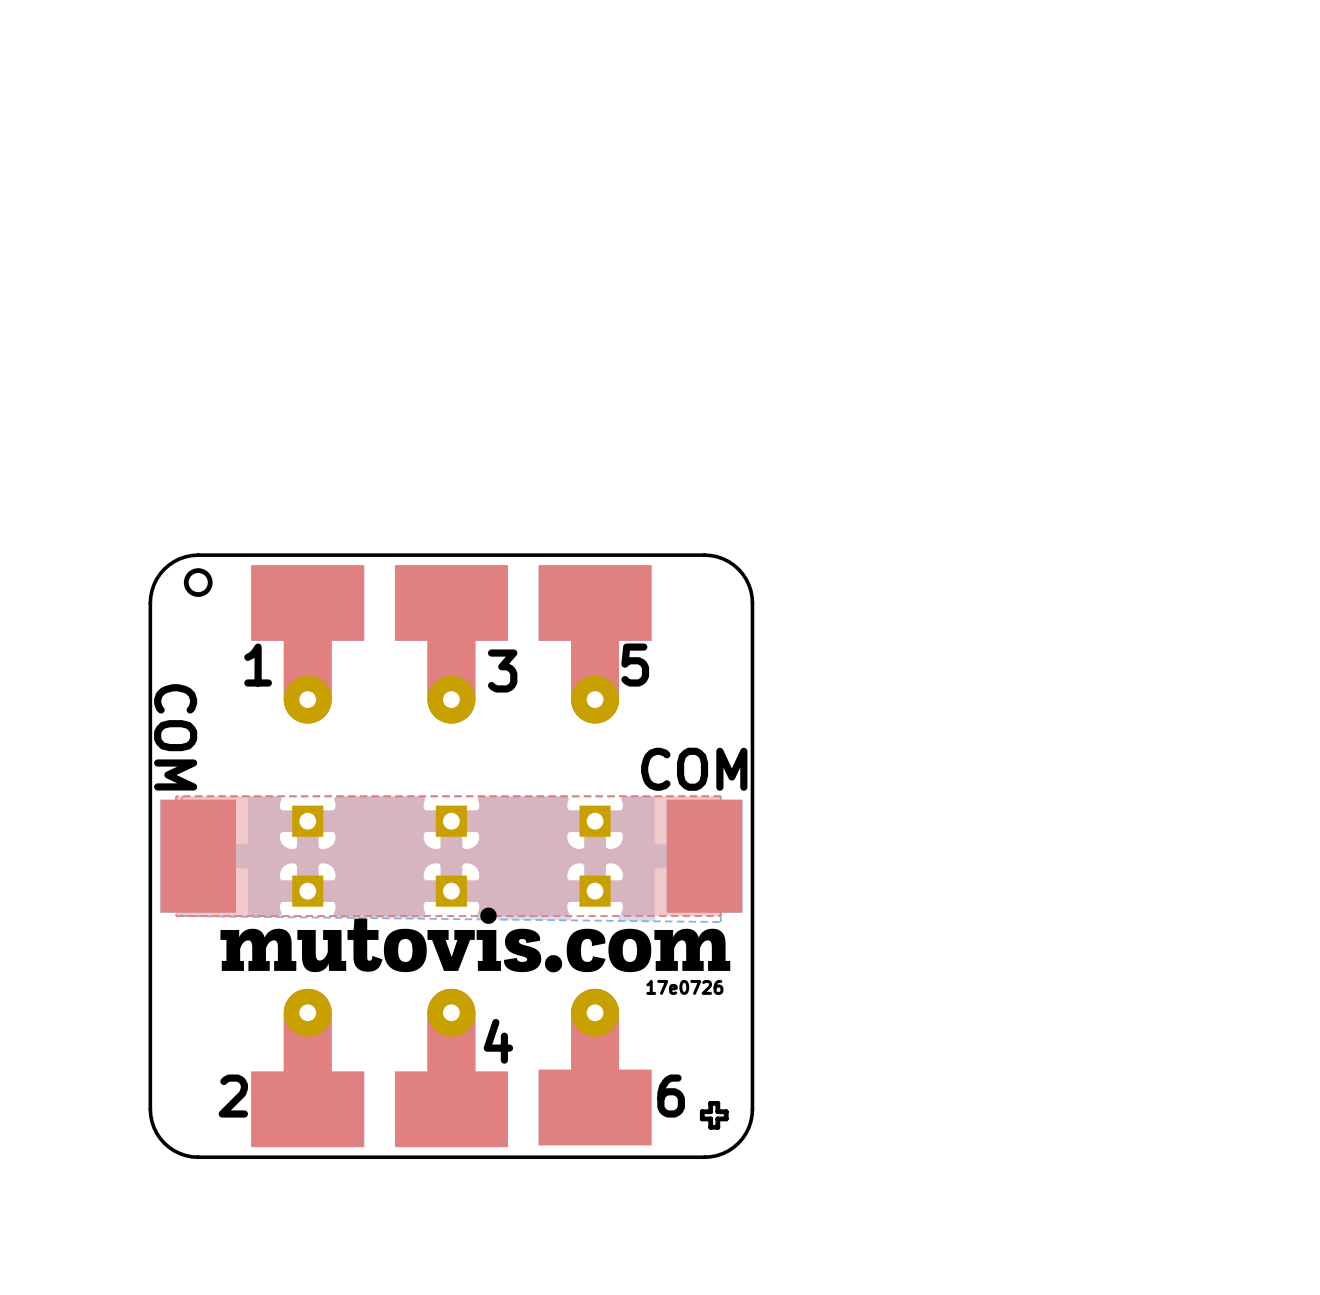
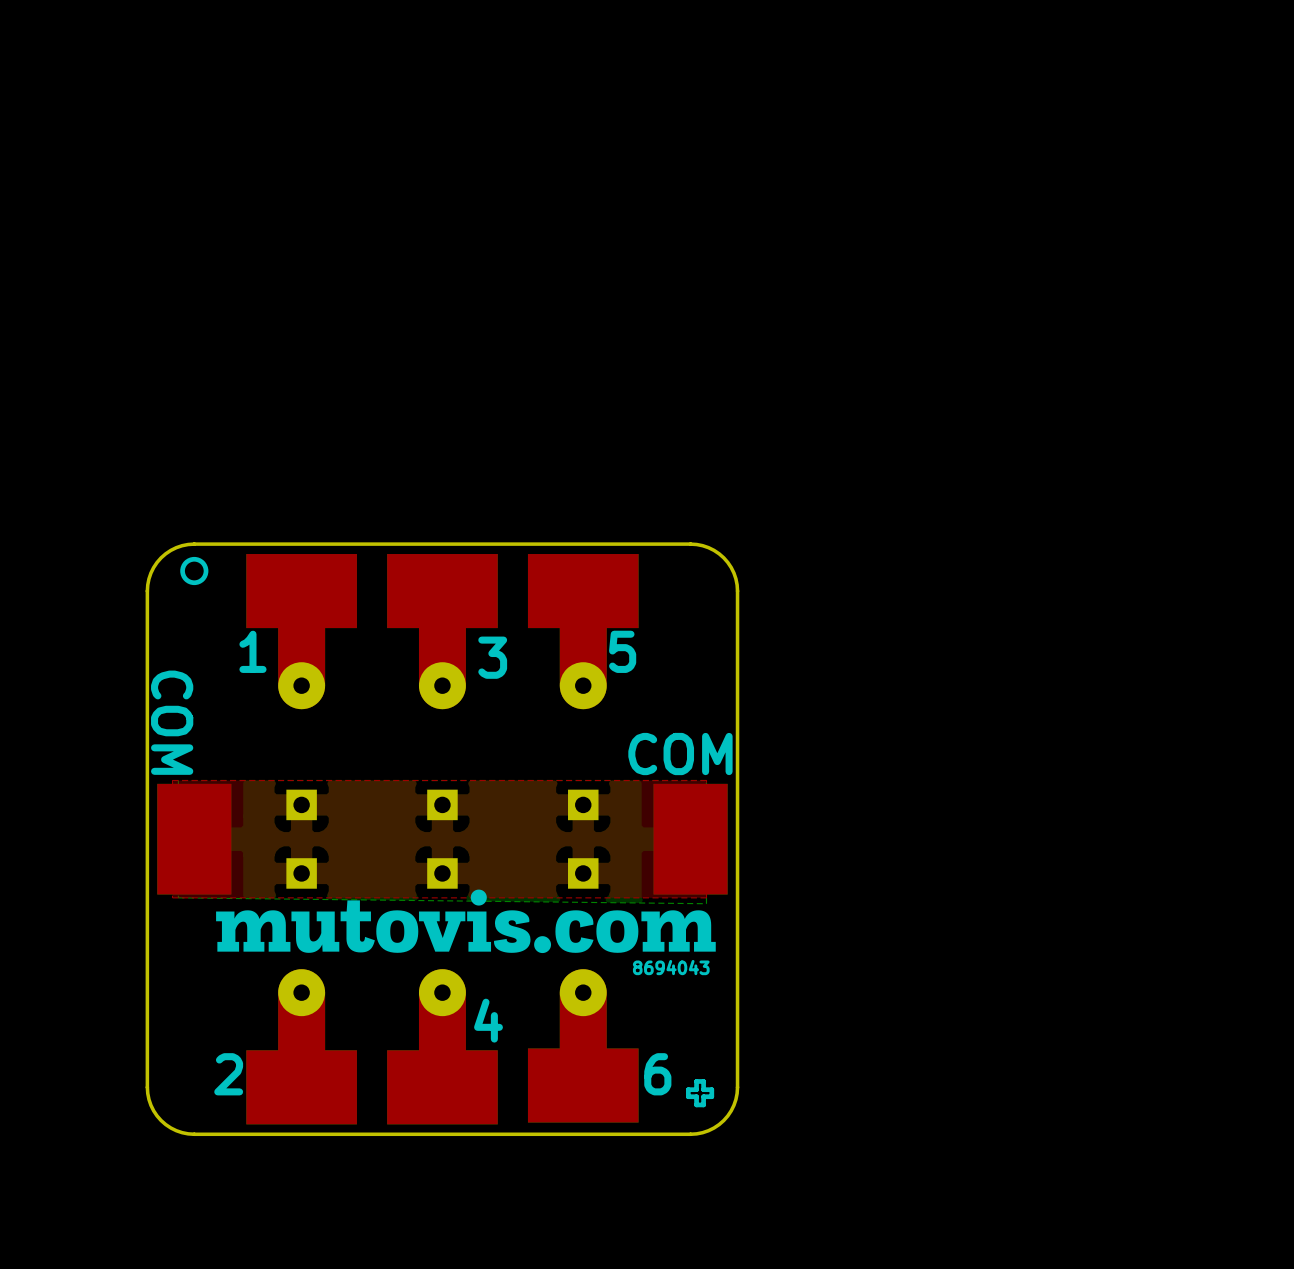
text: 17e0726 (684, 987) -> 8694043 (671, 967)

